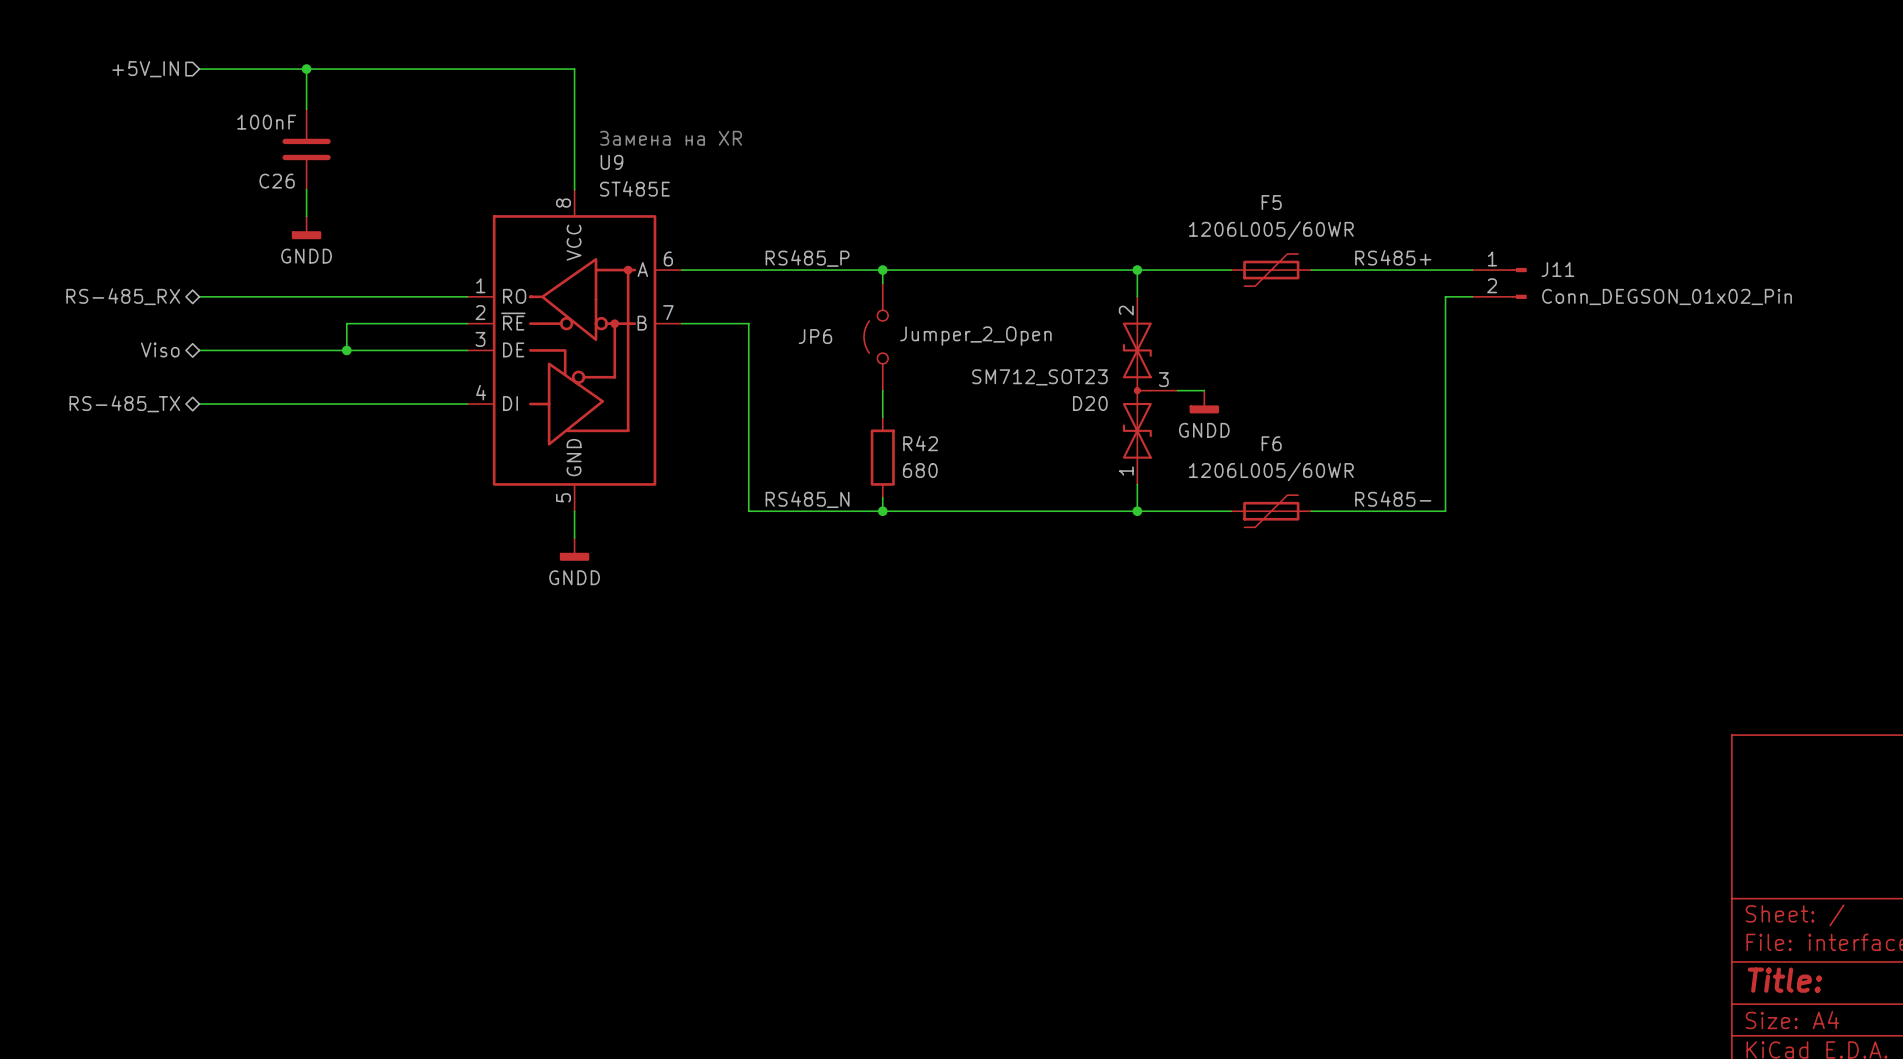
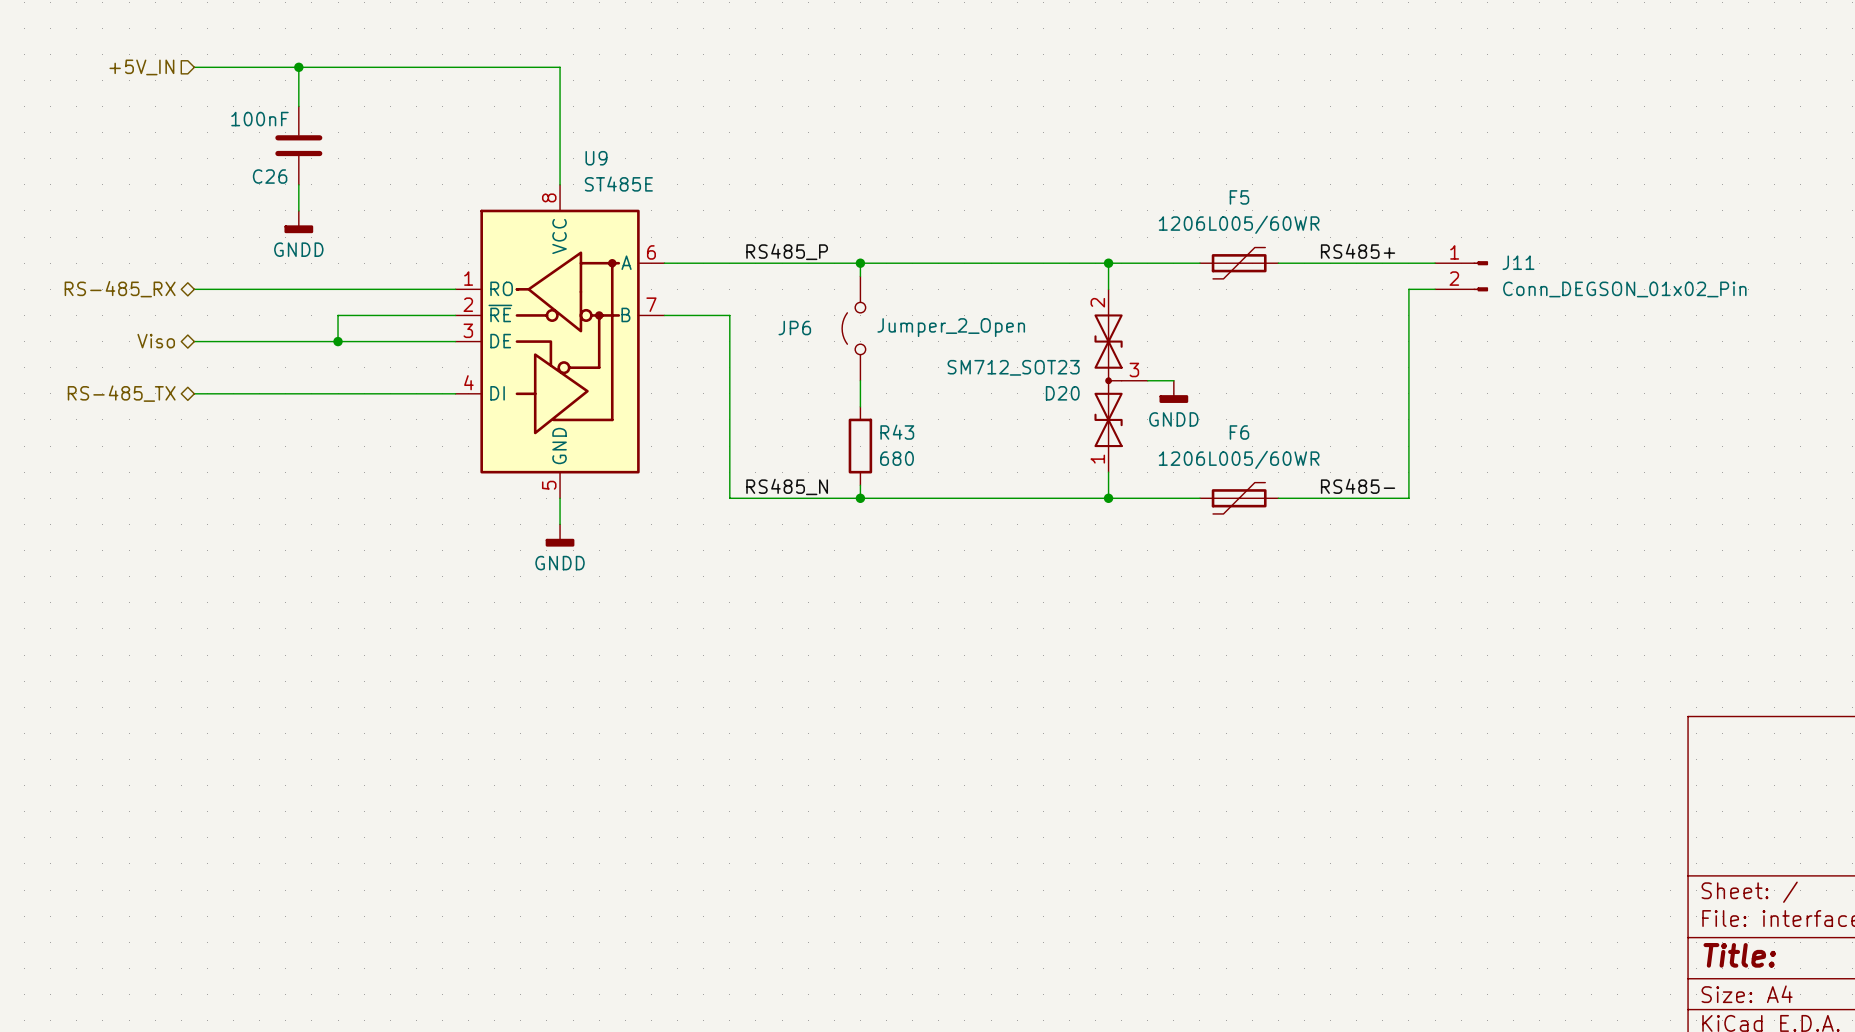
text: Замена на XR (671, 138) -> none
R42 name: R42 (920, 443) -> R43 (897, 432)

